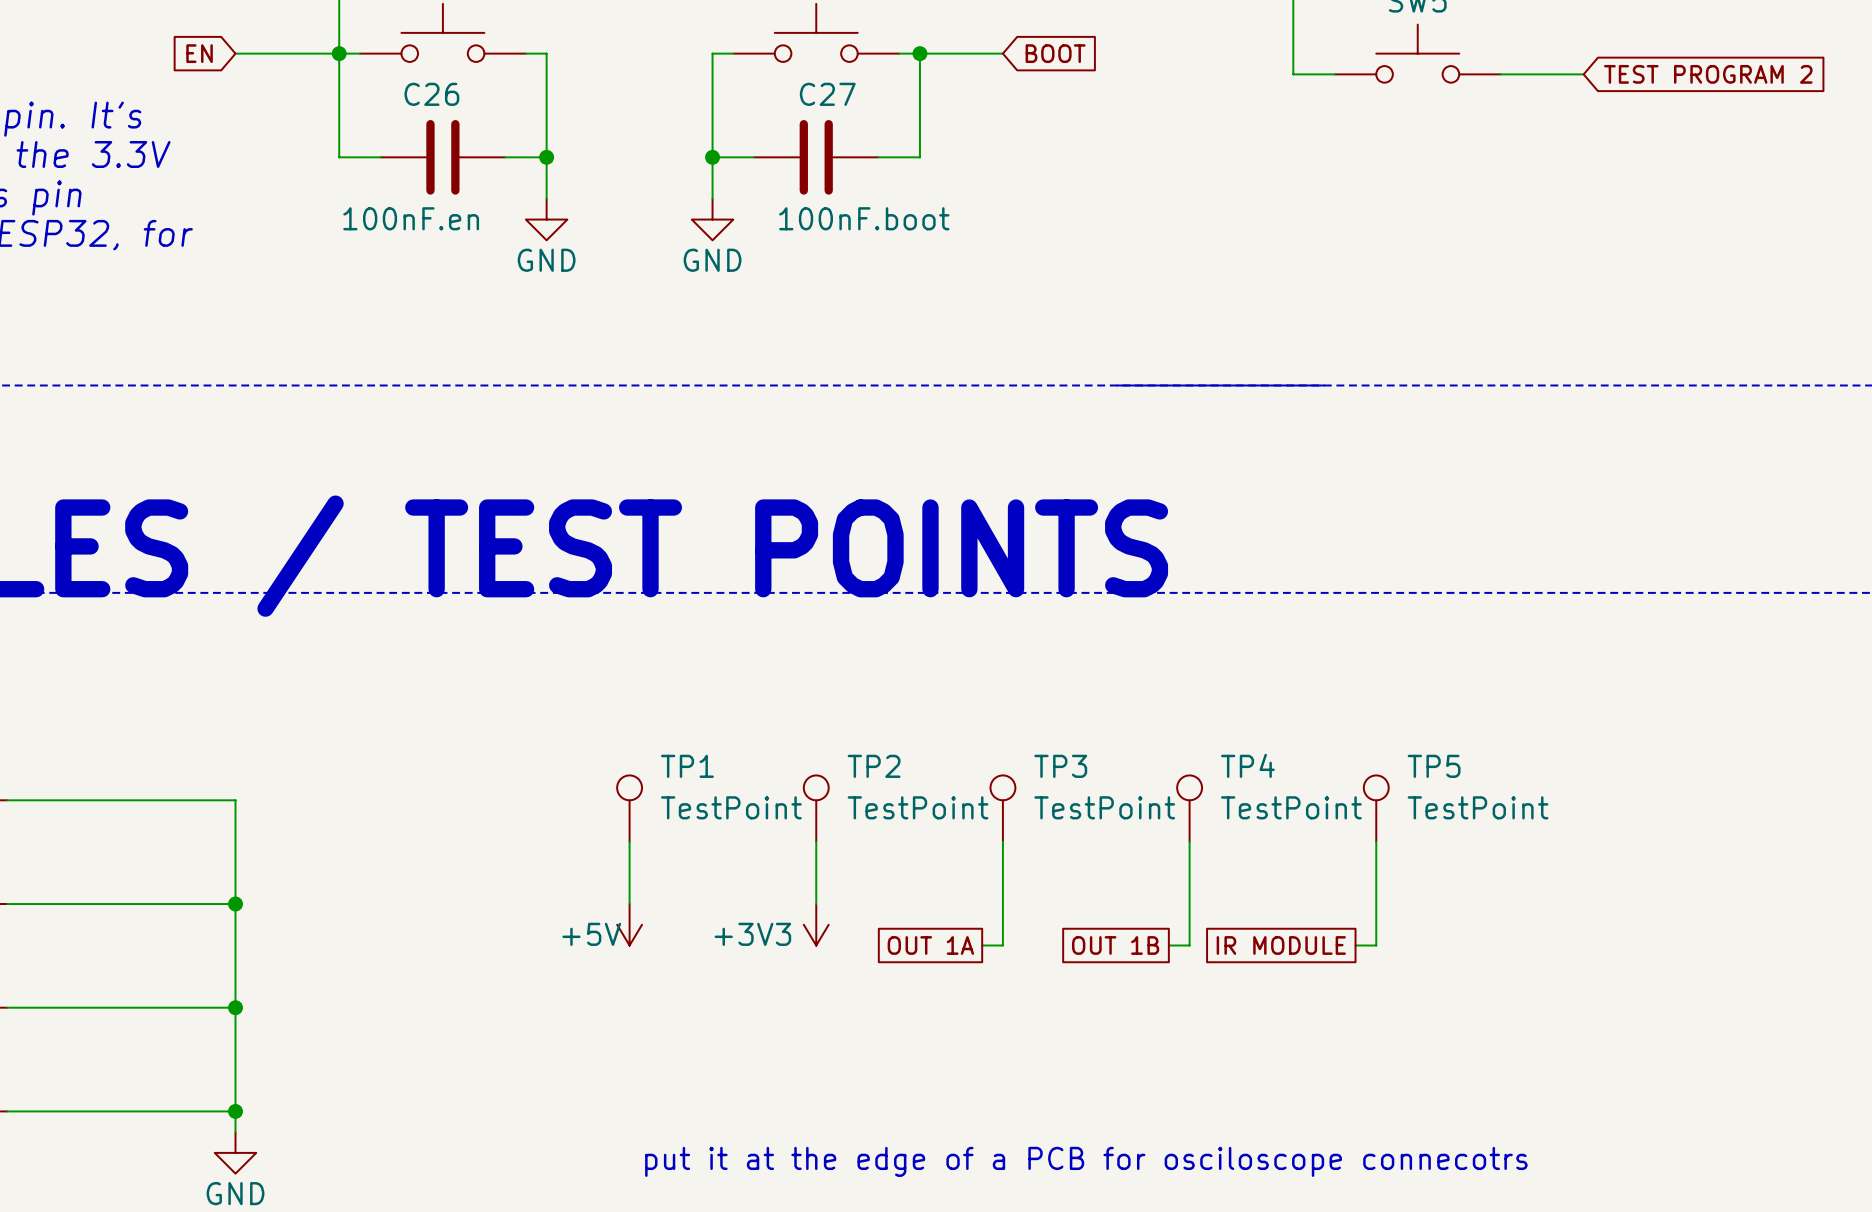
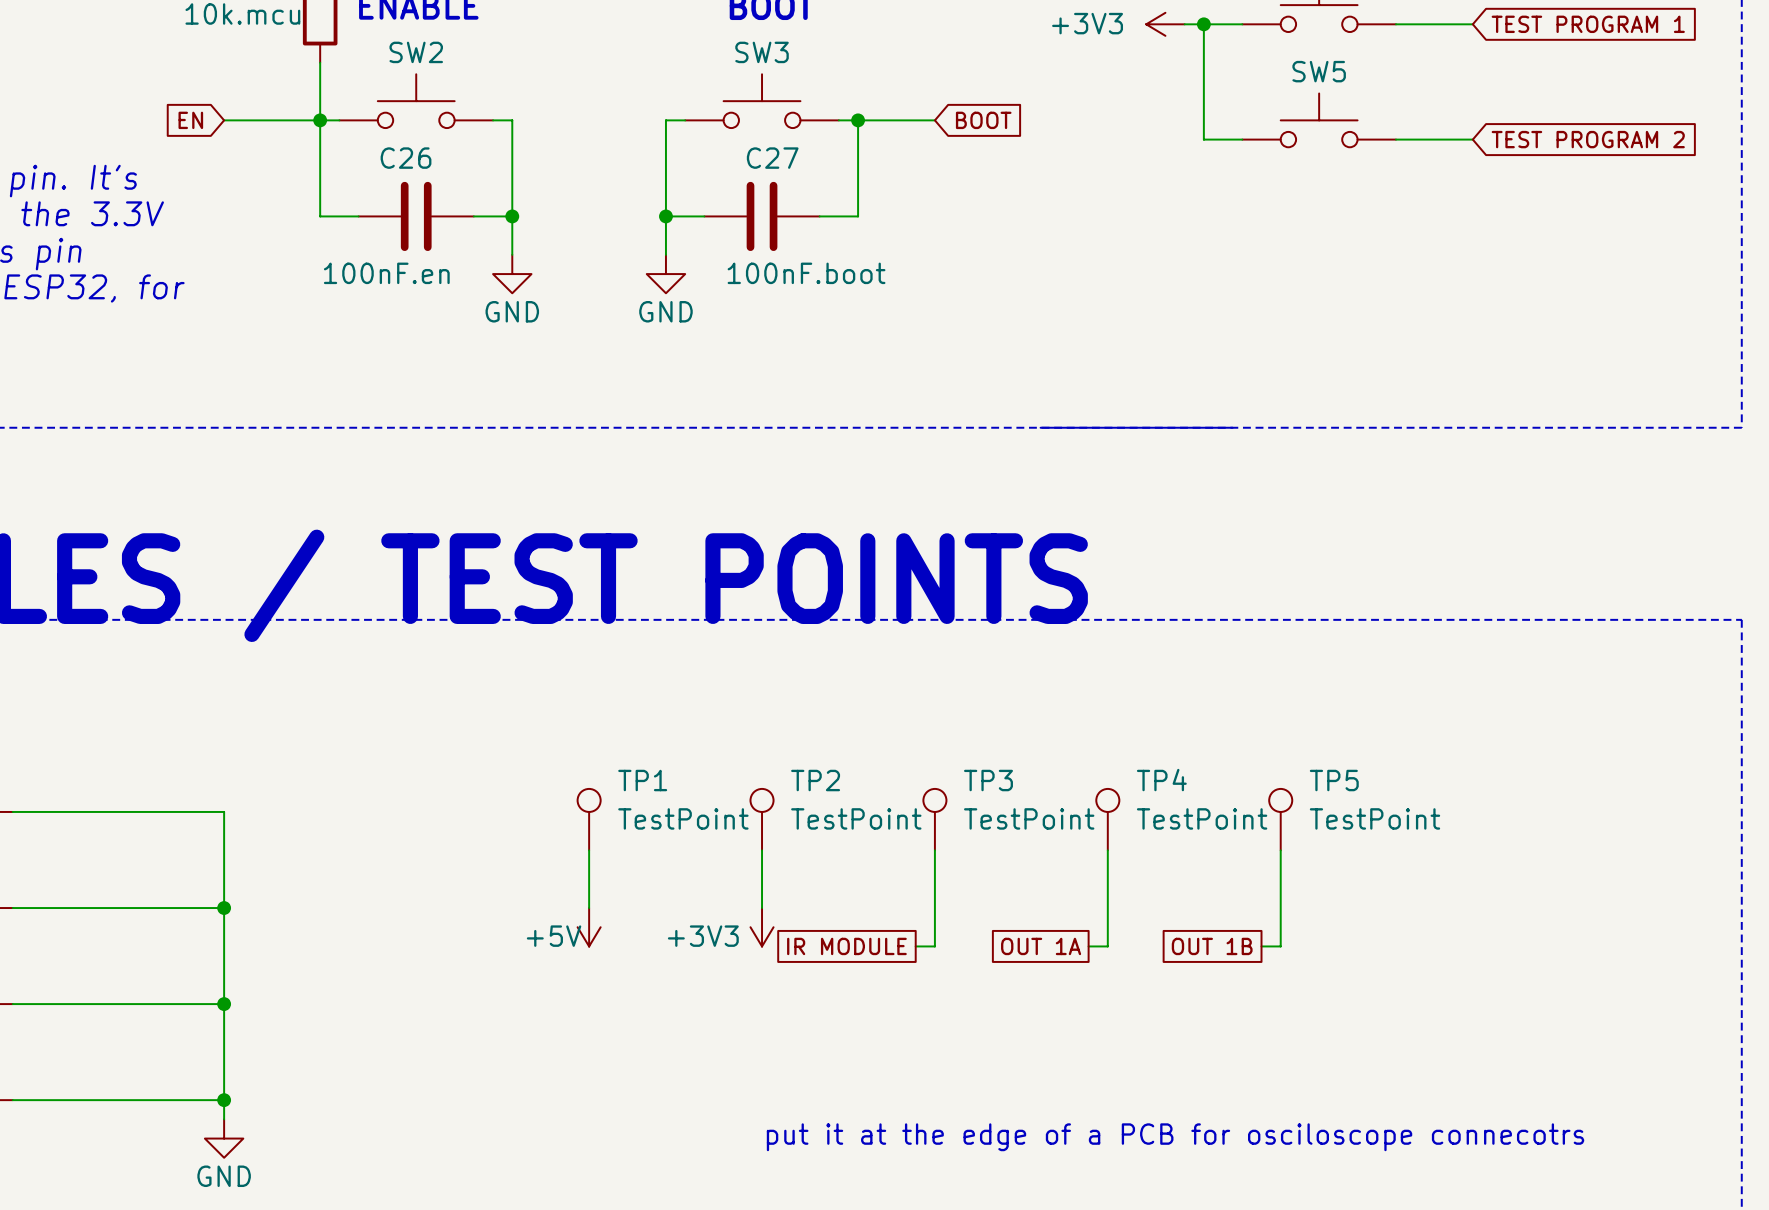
global label: OUT 1A (930, 945) -> IR MODULE (846, 946)
global label: OUT 1B (1115, 945) -> OUT 1A (1041, 946)
global label: IR MODULE (1281, 945) -> OUT 1B (1212, 946)
text position: put it at the edge of a PCB for osciloscope connecotrs (1086, 1161) -> put it at the edge of a PCB for osciloscope connecotrs (1175, 1137)

